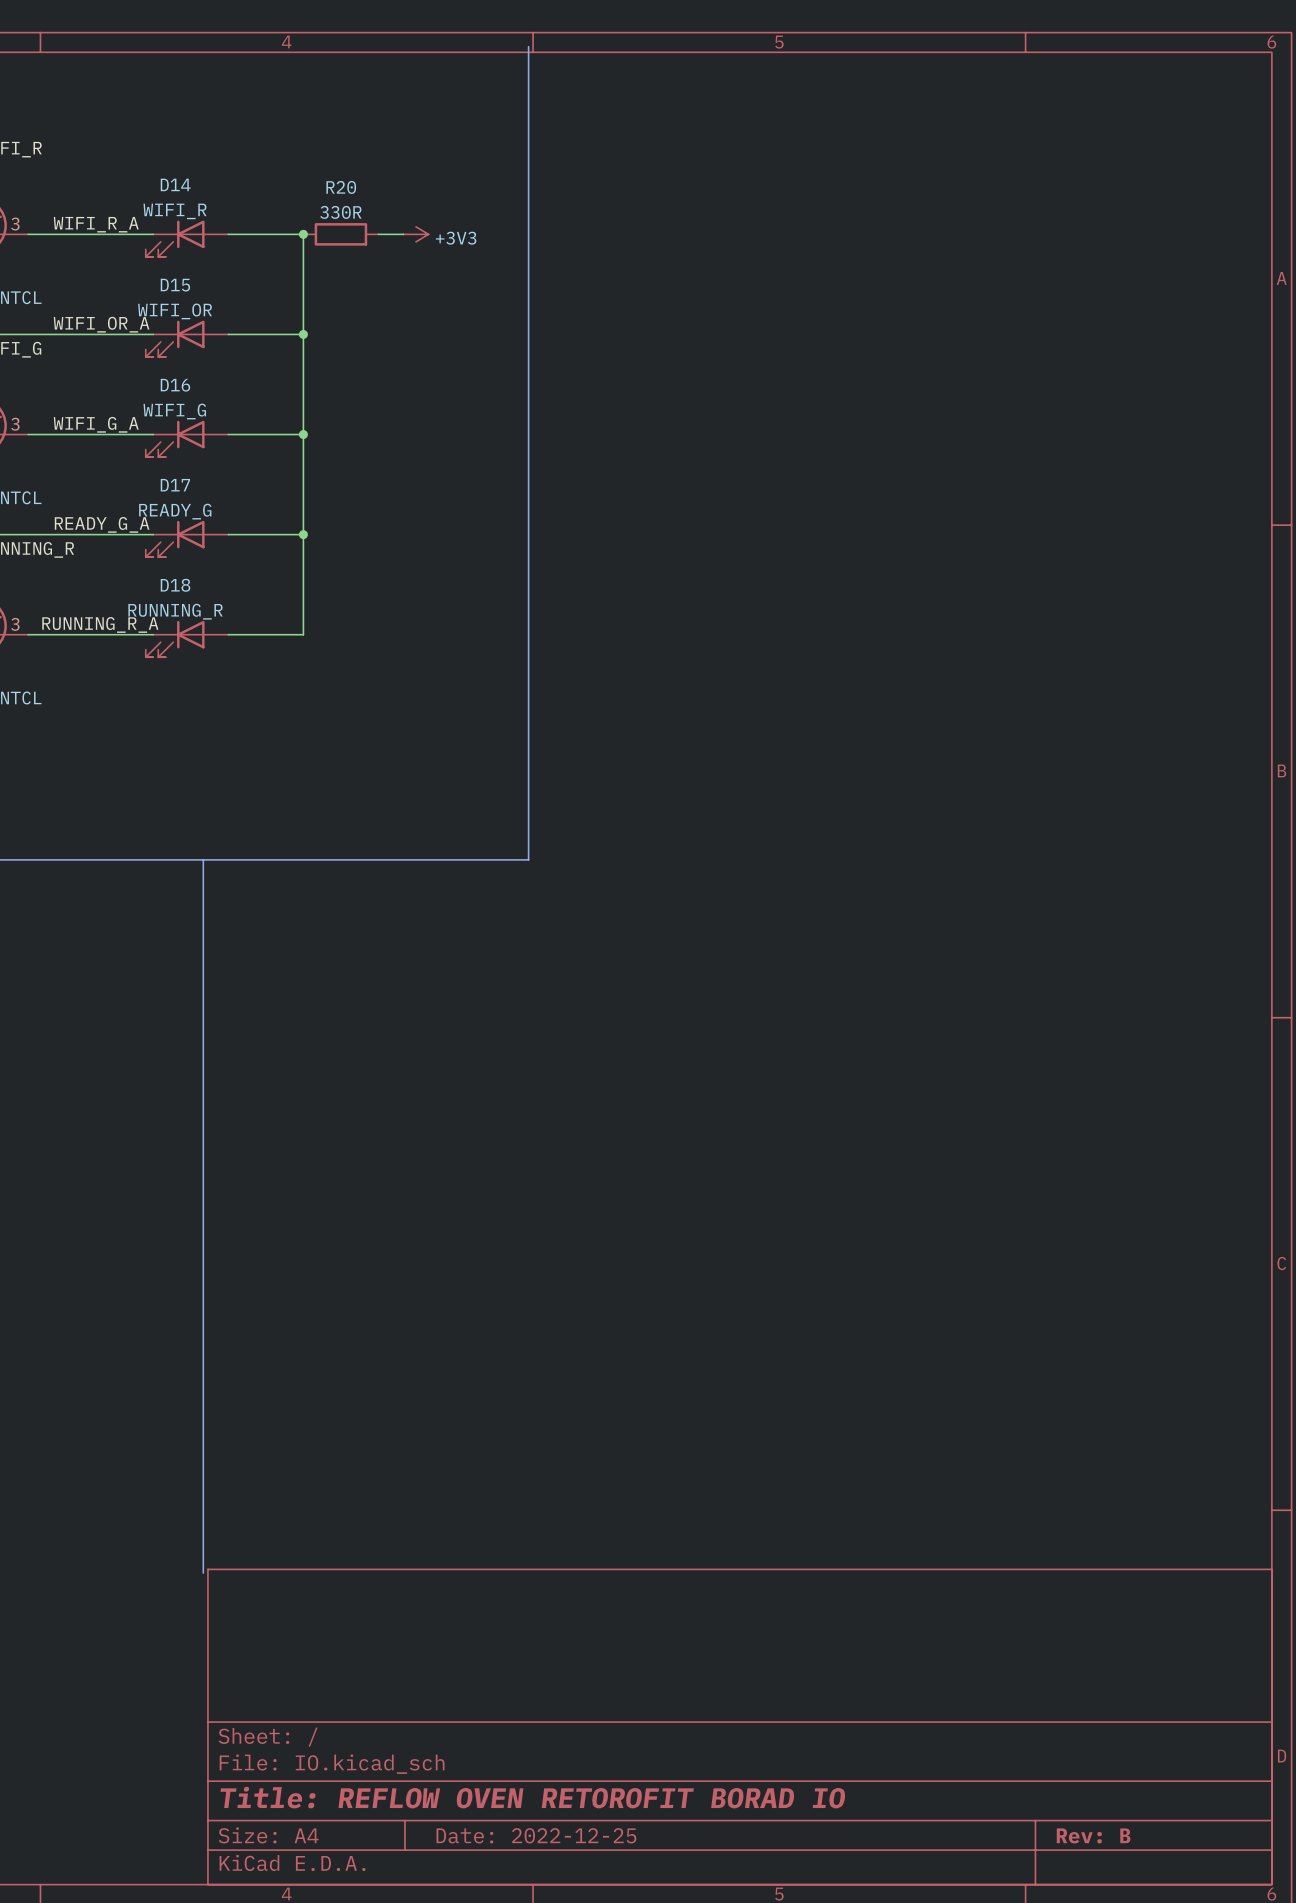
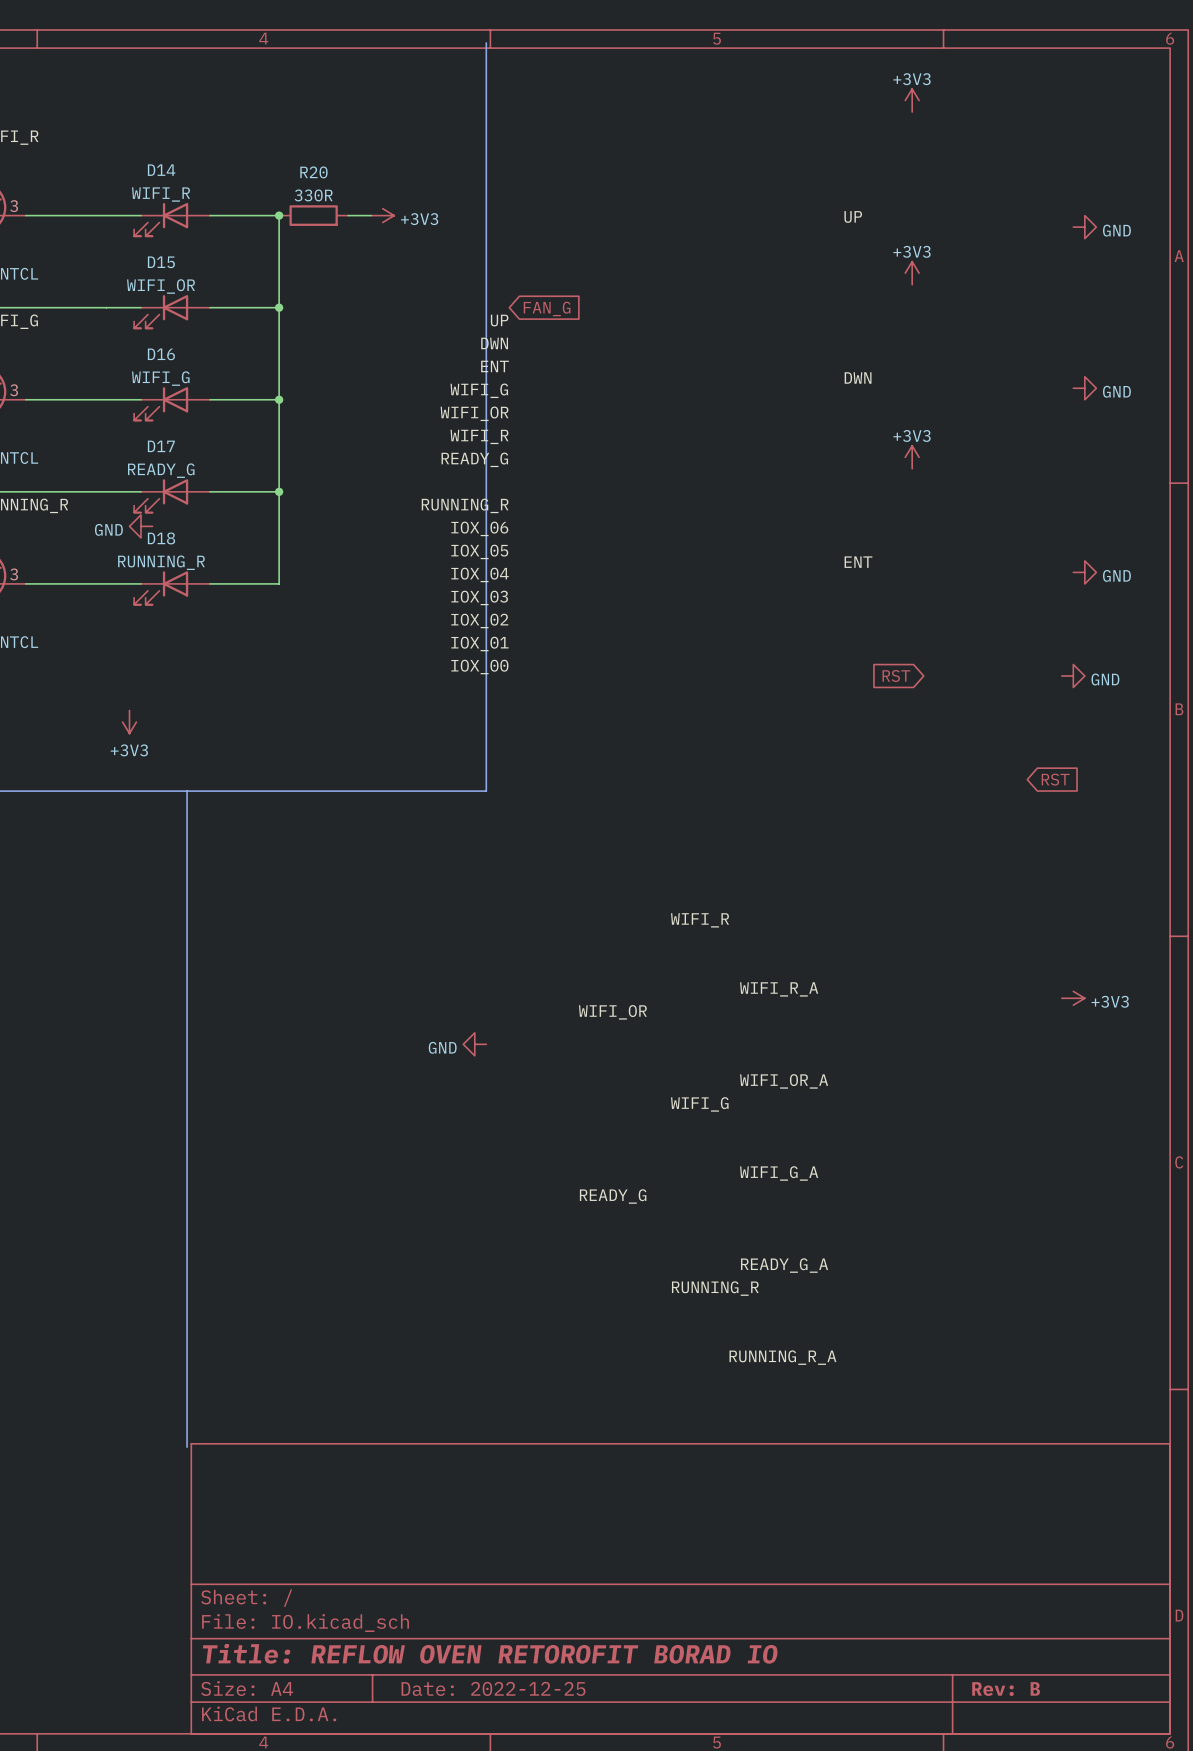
power symbol: none -> +3V3 (912, 100)
label: WIFI_R_A (96, 224) -> none
label: none -> UP (853, 216)
power symbol: none -> GND (1084, 227)
power symbol: none -> +3V3 (912, 273)
label: WIFI_OR_A (101, 324) -> none
global label: none -> FAN_G (547, 308)
label: none -> UP (499, 320)
label: none -> DWN (494, 343)
label: none -> ENT (495, 366)
label: none -> DWN (858, 377)
power symbol: none -> GND (1084, 388)
label: WIFI_G_A (96, 424) -> none
label: none -> WIFI_G (479, 390)
label: none -> WIFI_OR (474, 413)
label: none -> WIFI_R (479, 436)
power symbol: none -> +3V3 (912, 457)
label: none -> READY_G (474, 459)
label: READY_G_A (102, 524) -> none
label: none -> RUNNING_R (465, 505)
power symbol: none -> GND (141, 526)
label: none -> IOX_06 (479, 528)
label: none -> IOX_05 (479, 551)
label: none -> ENT (858, 562)
power symbol: none -> GND (1084, 572)
label: RUNNING_R_A (100, 624) -> none
label: none -> IOX_04 (480, 574)
label: none -> IOX_03 (479, 597)
label: none -> IOX_02 (479, 620)
label: none -> IOX_01 (479, 644)
label: none -> IOX_00 (479, 667)
global label: none -> RST (896, 676)
power symbol: none -> GND (1073, 676)
power symbol: none -> +3V3 (129, 722)
global label: none -> RST (1055, 779)
label: none -> WIFI_R (700, 920)
label: none -> WIFI_R_A (779, 989)
power symbol: none -> +3V3 (1073, 998)
label: none -> WIFI_OR (612, 1012)
power symbol: none -> GND (474, 1044)
label: none -> WIFI_OR_A (784, 1081)
label: none -> WIFI_G (699, 1104)
label: none -> WIFI_G_A (779, 1173)
label: none -> READY_G (613, 1196)
label: none -> READY_G_A (784, 1265)
label: none -> RUNNING_R (715, 1288)
label: none -> RUNNING_R_A (782, 1357)

